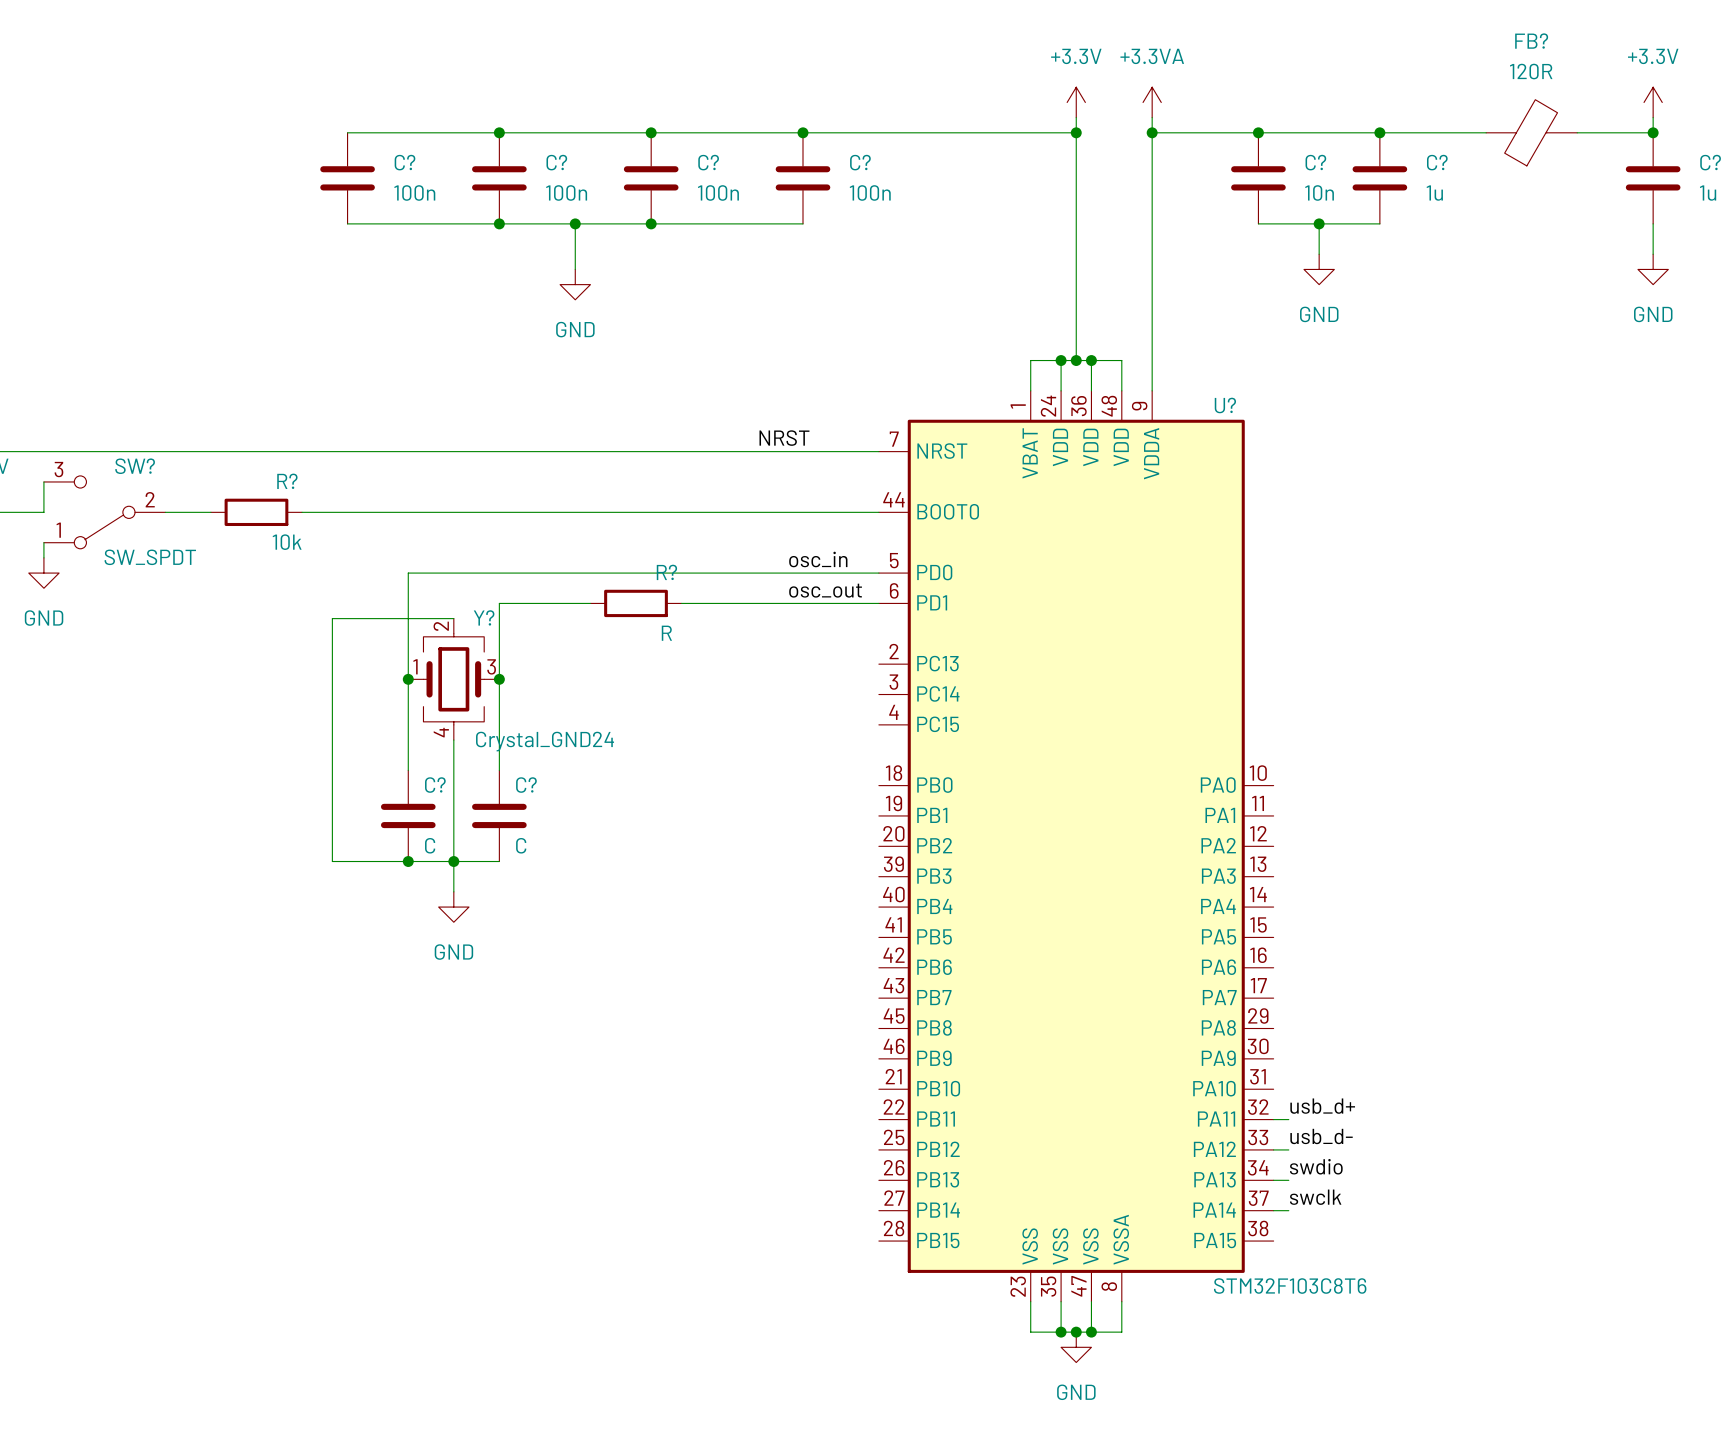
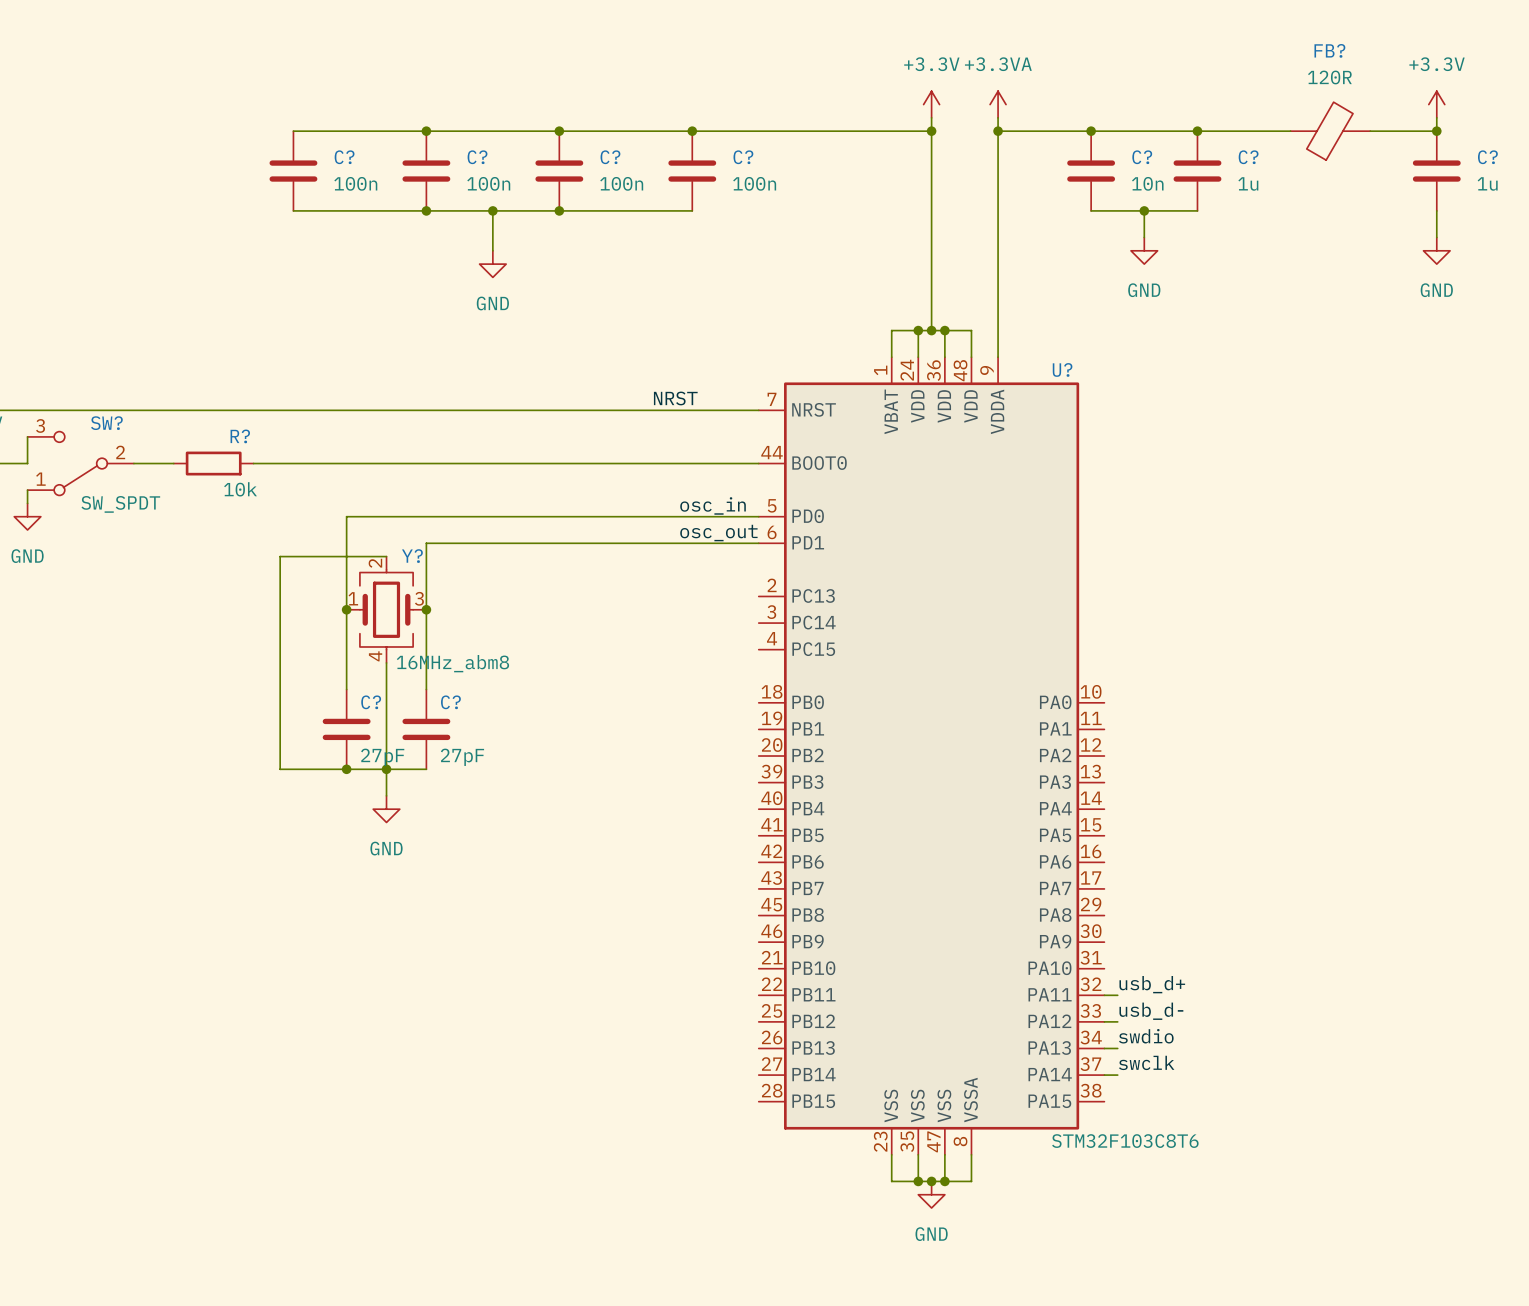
wire: none -> (506, 543) (585, 543)
R?: R (636, 603) -> none
Y? value: Crystal_GND24 (545, 741) -> 16MHz_abm8 (452, 663)
C? value: C (430, 845) -> 27pF (382, 757)
C? value: C (521, 845) -> 27pF (462, 757)

